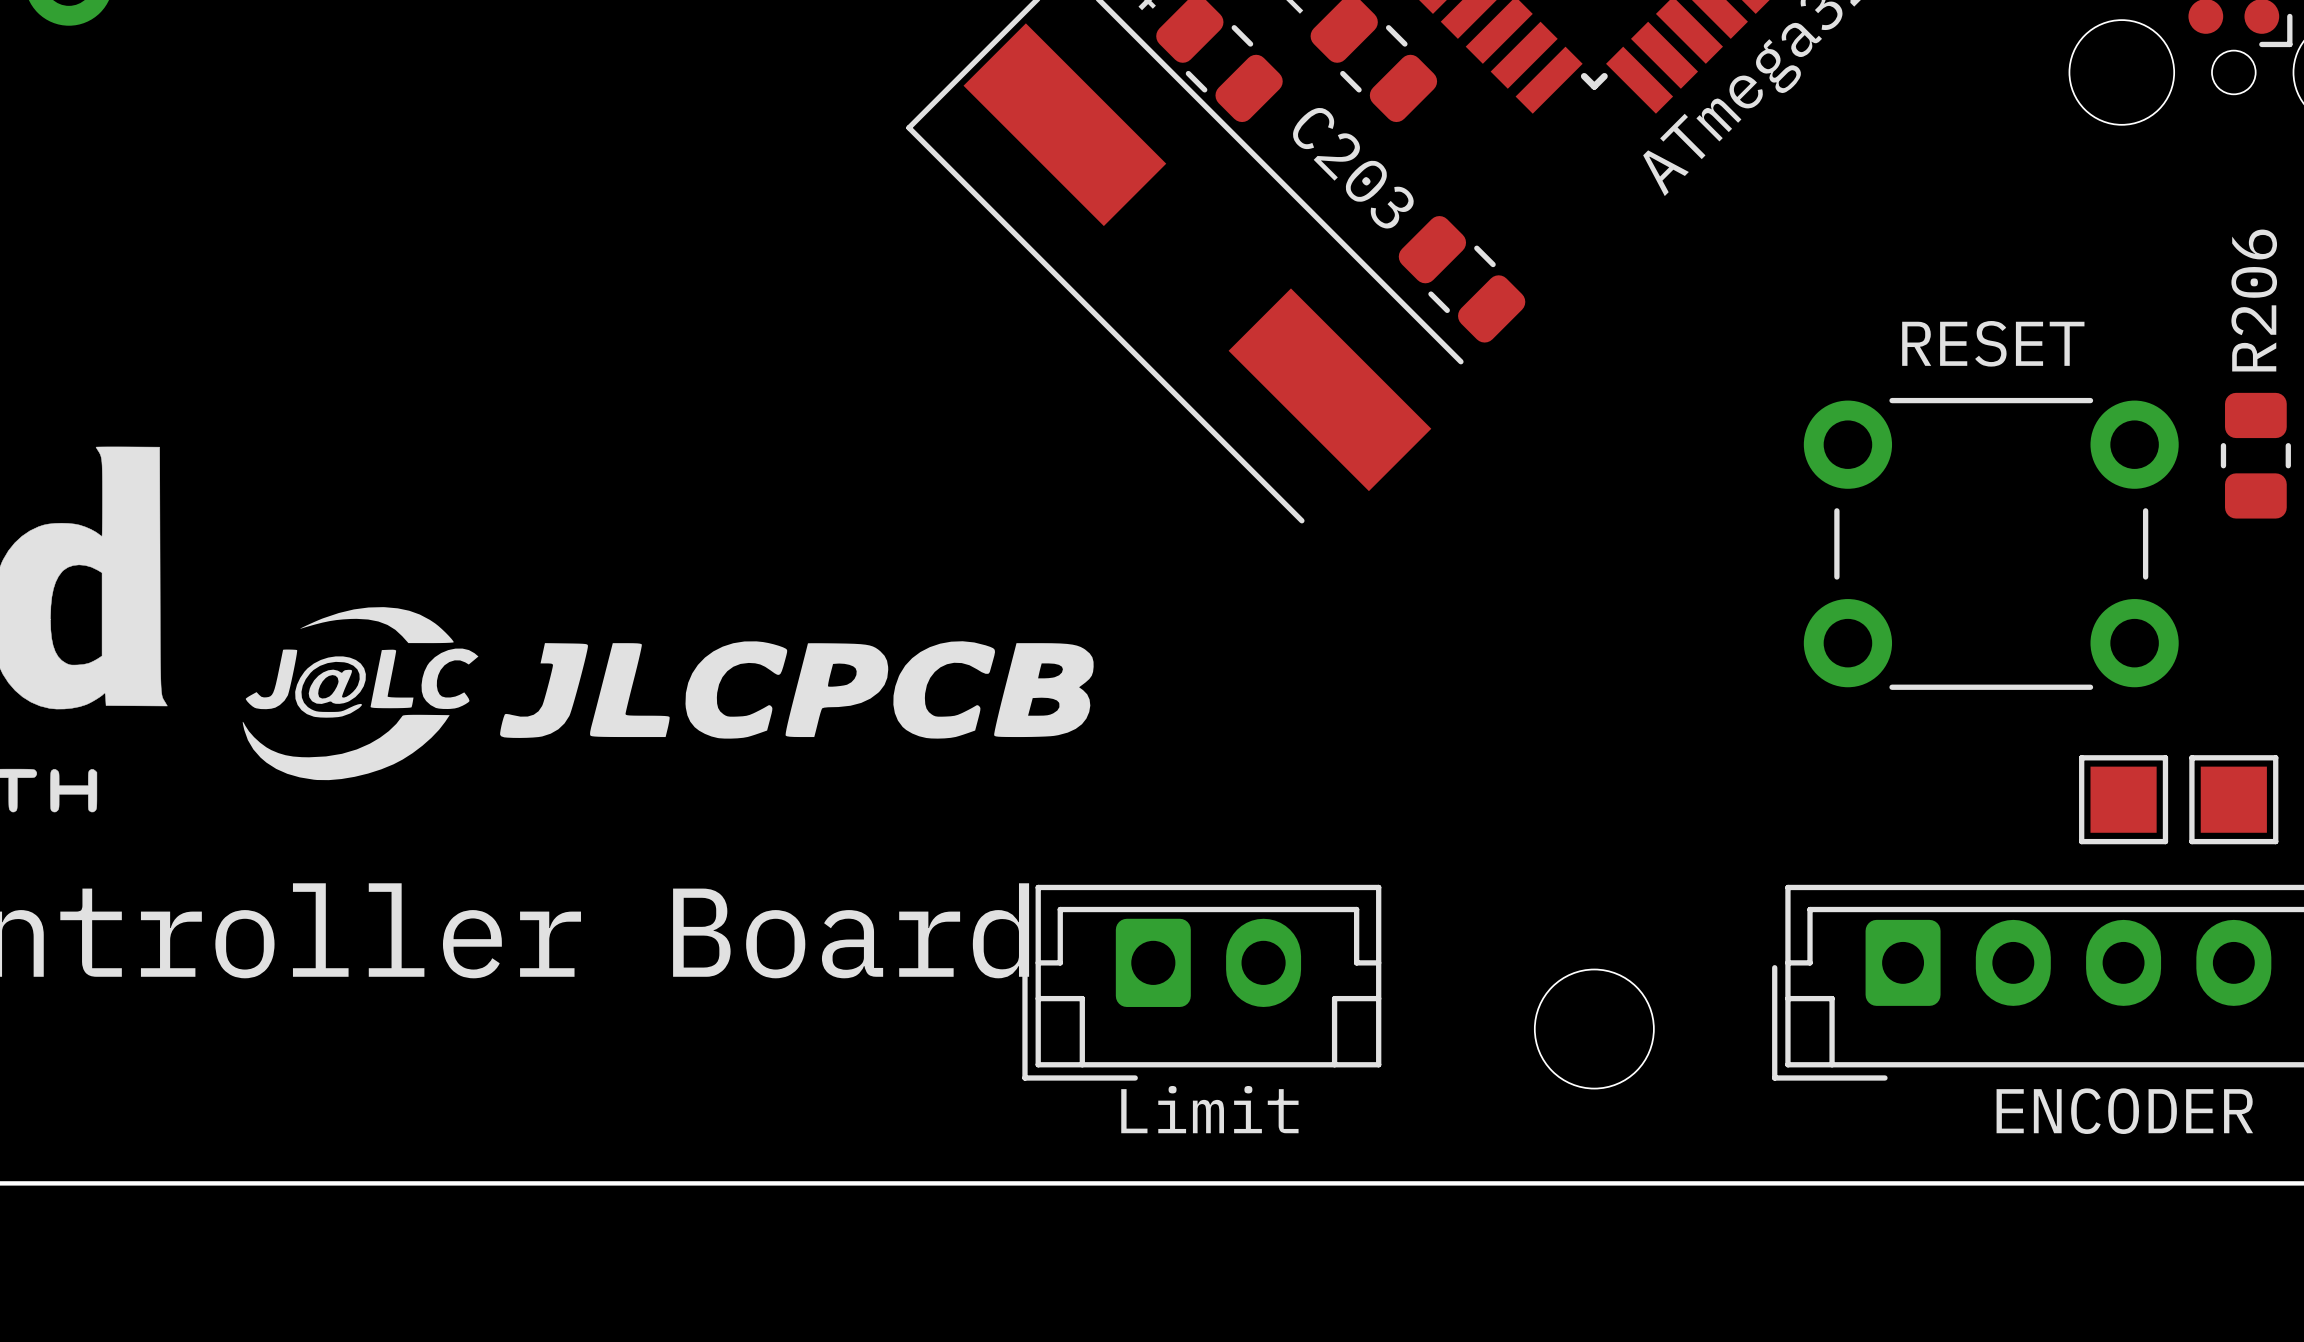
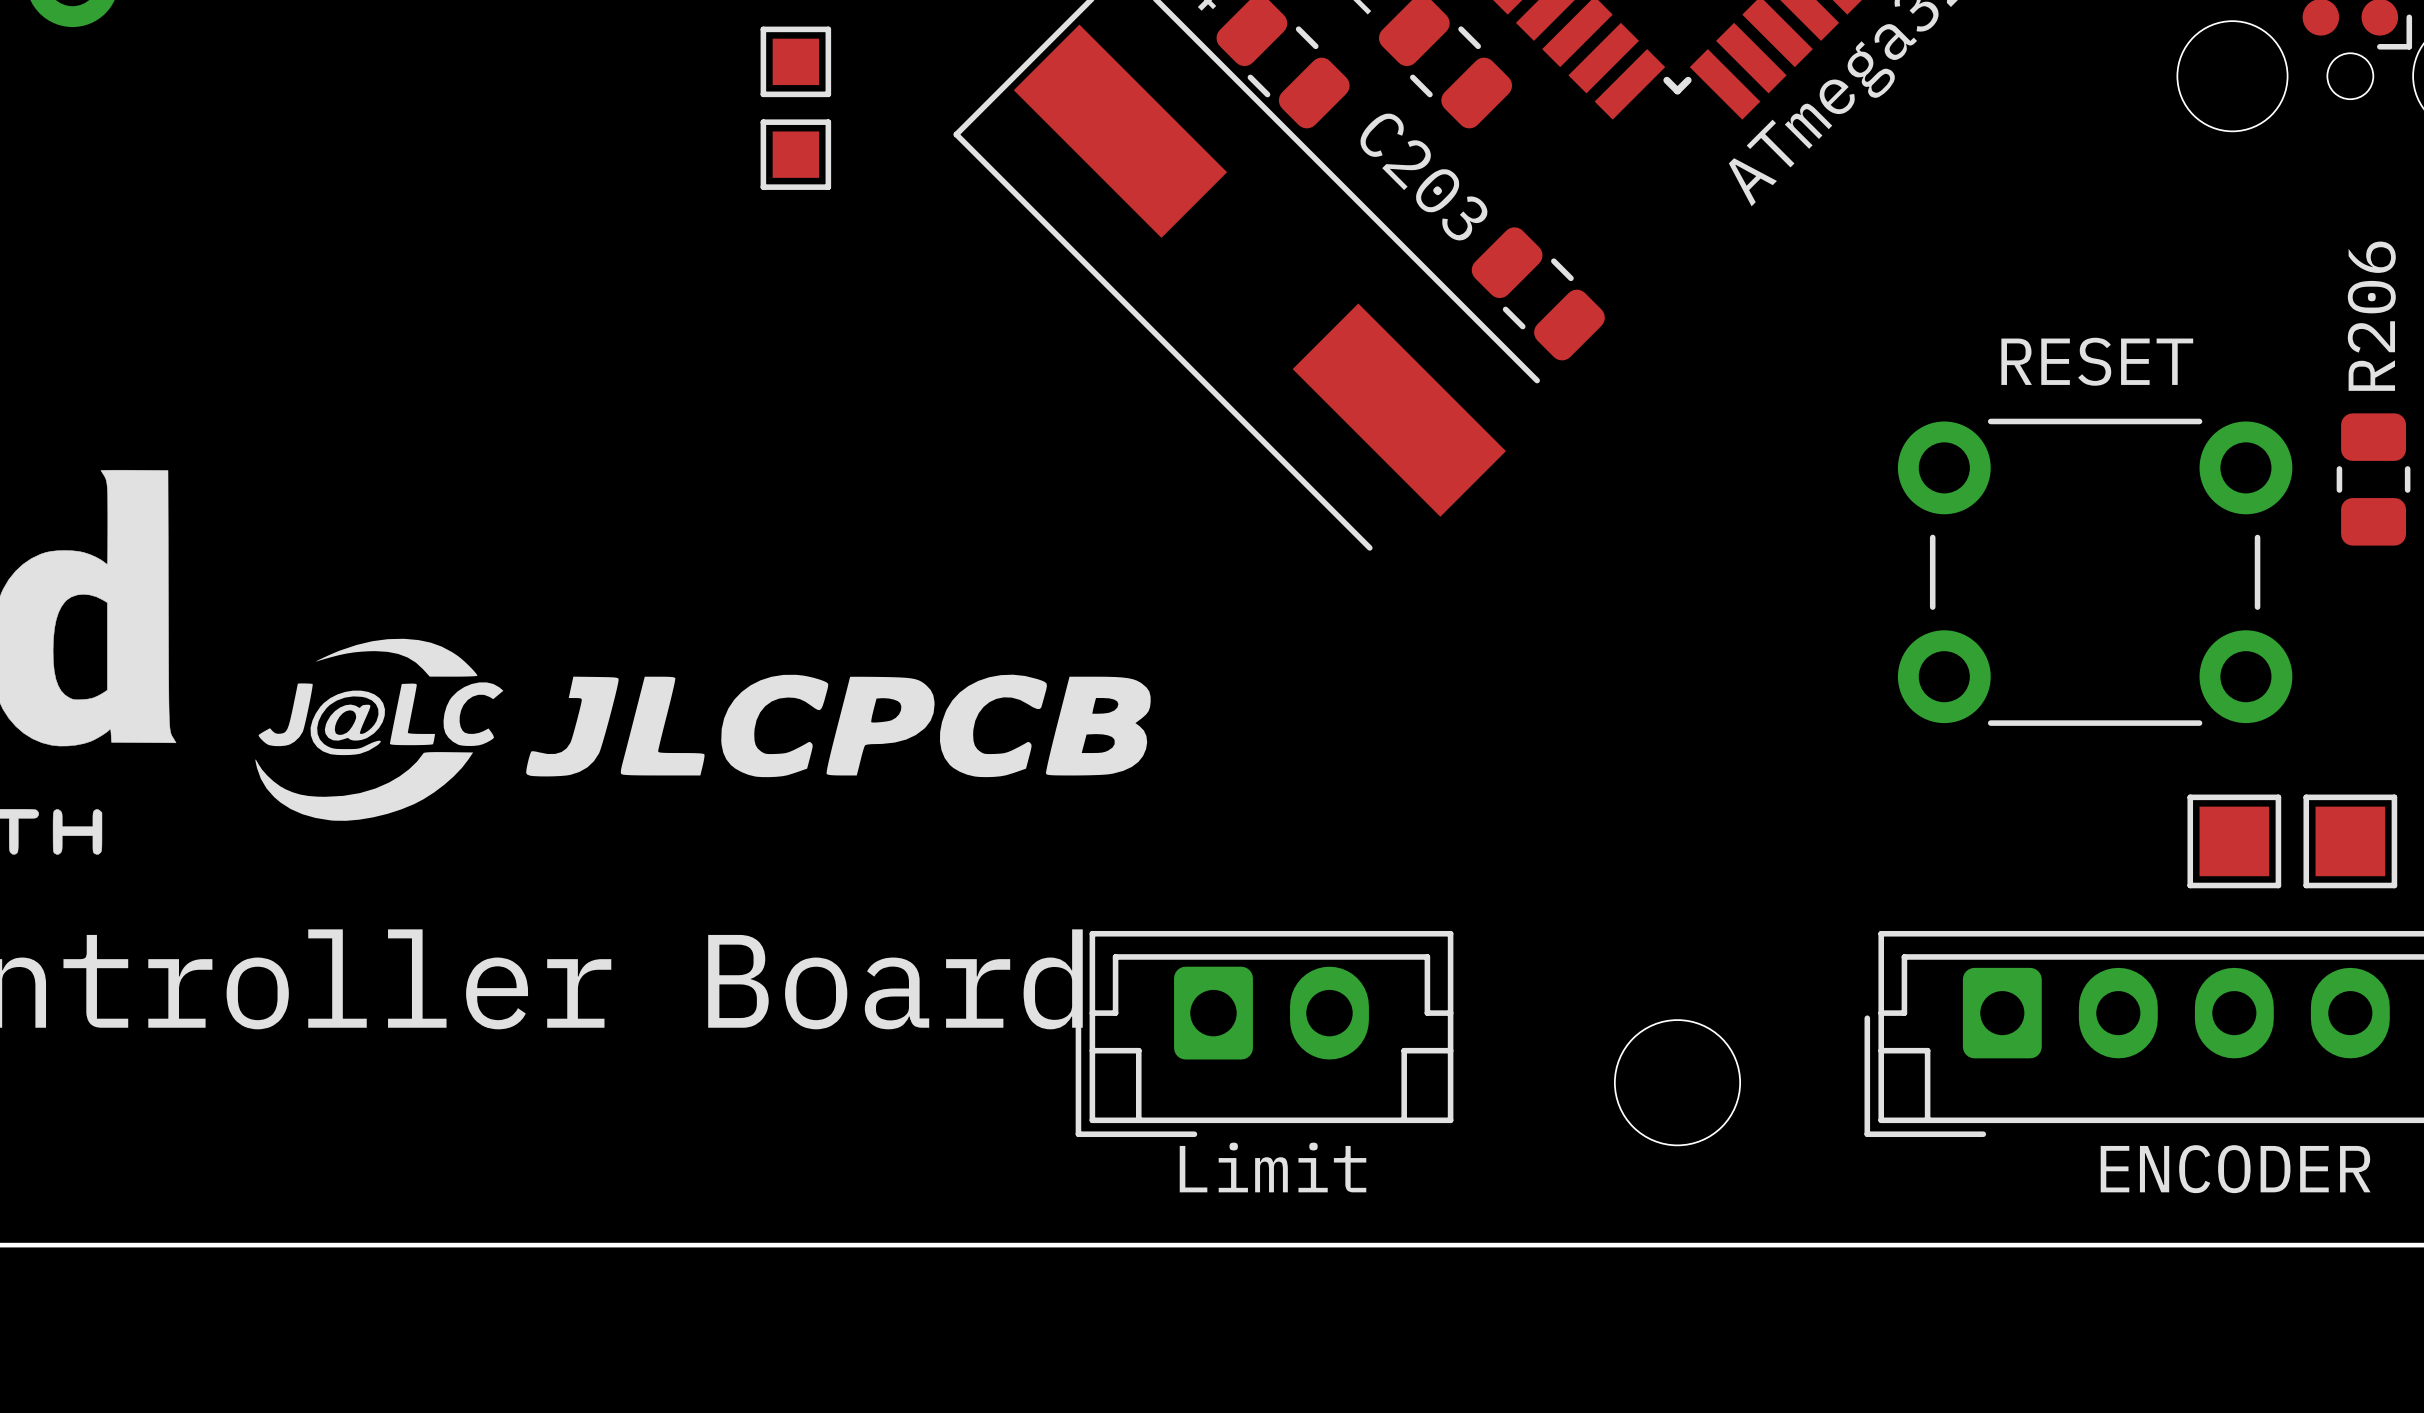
part: none -> (795, 61)
part: none -> (795, 154)

